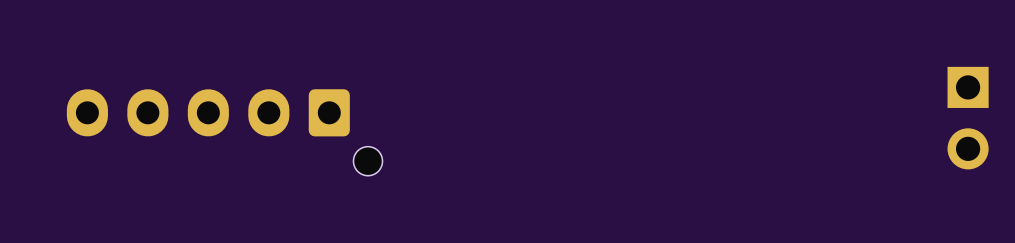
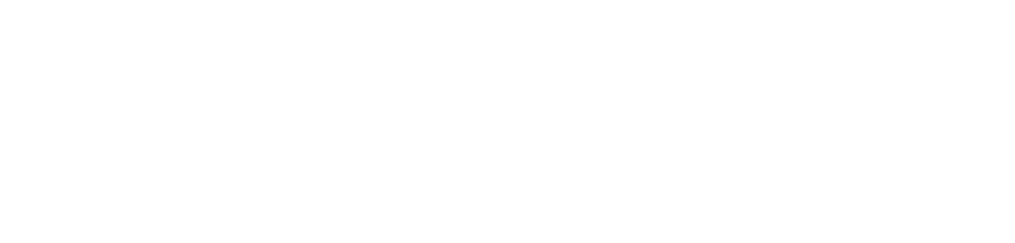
part: (968, 118) -> none
part: (224, 132) -> none

